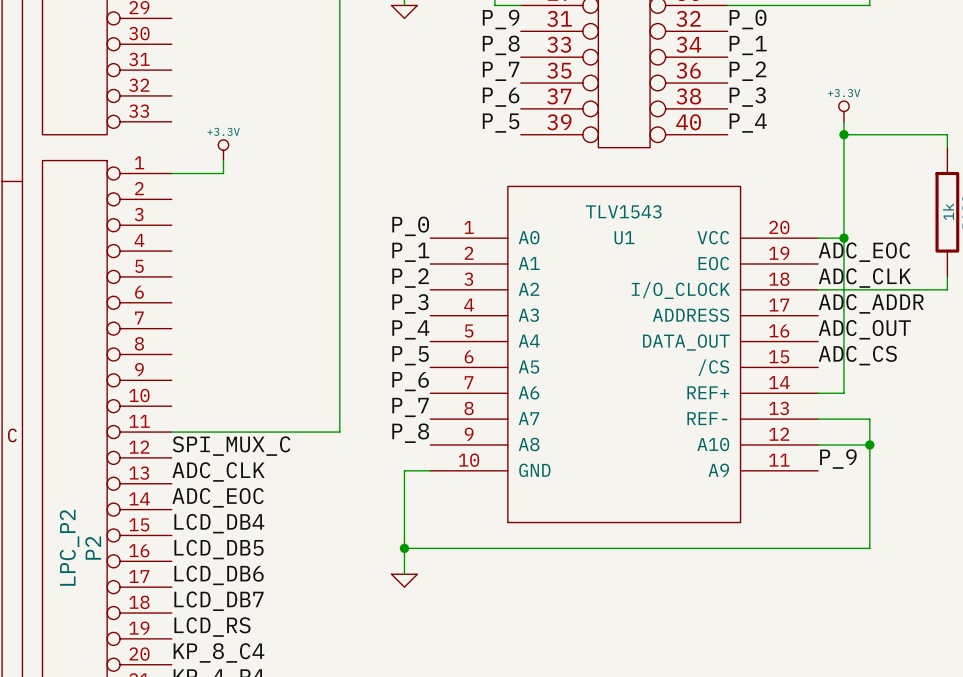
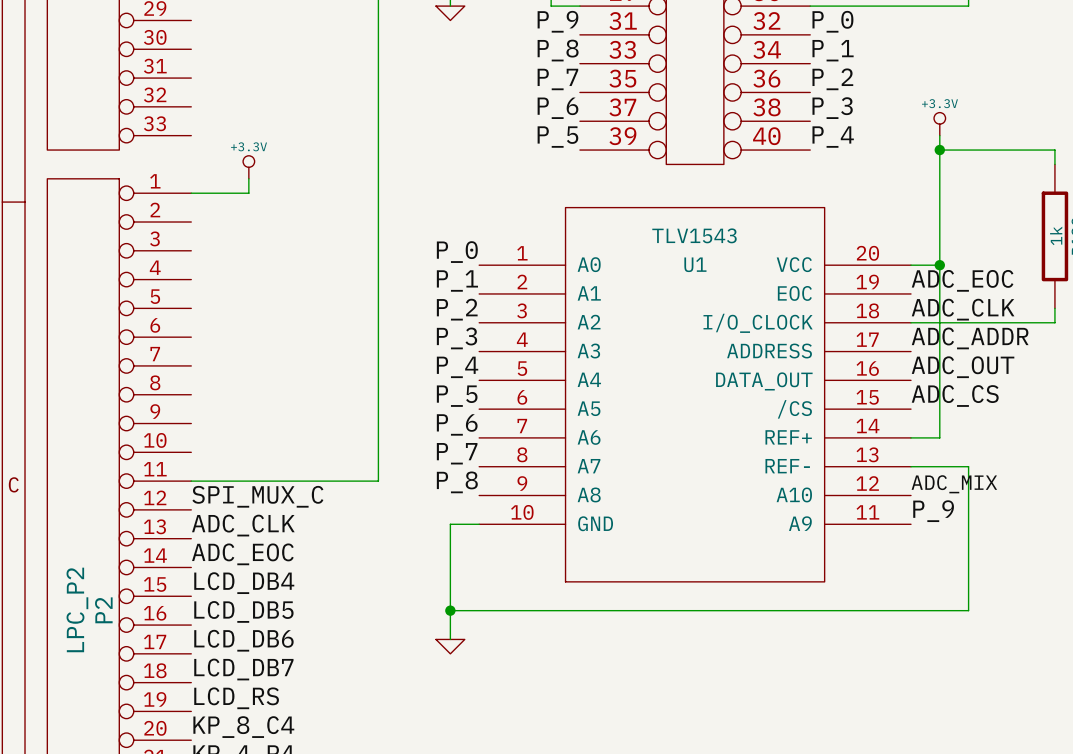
label: none -> ADC_MIX (954, 484)
wire: (818, 444) (869, 444) -> none
junction: (869, 444) -> none

